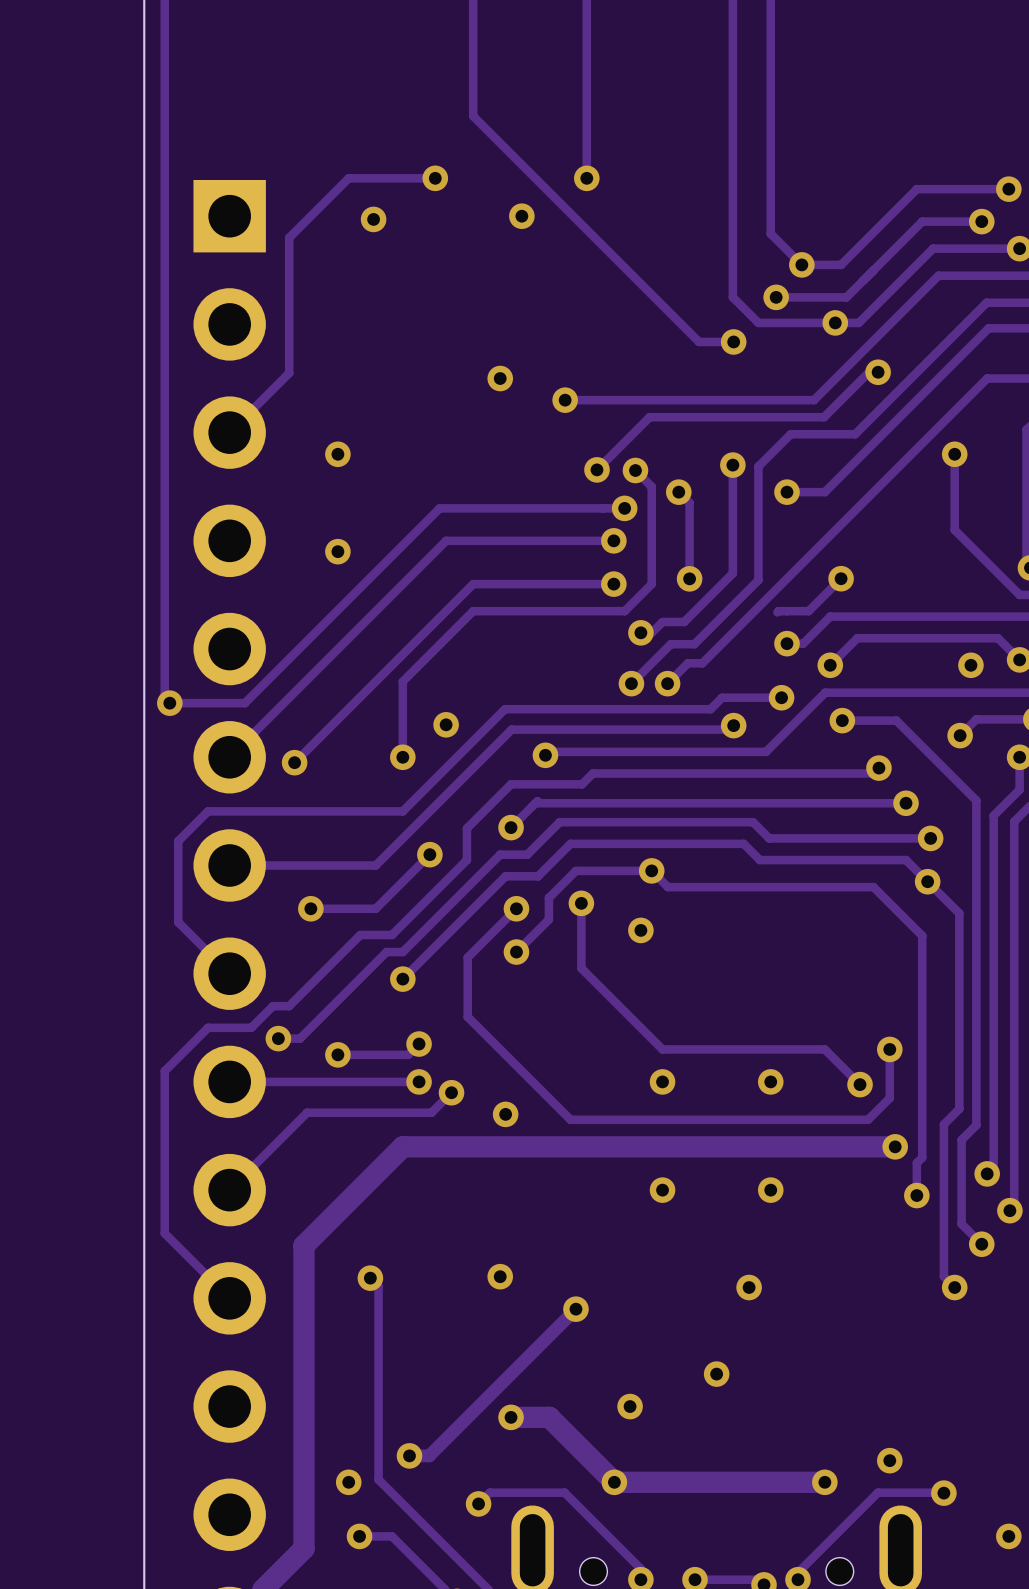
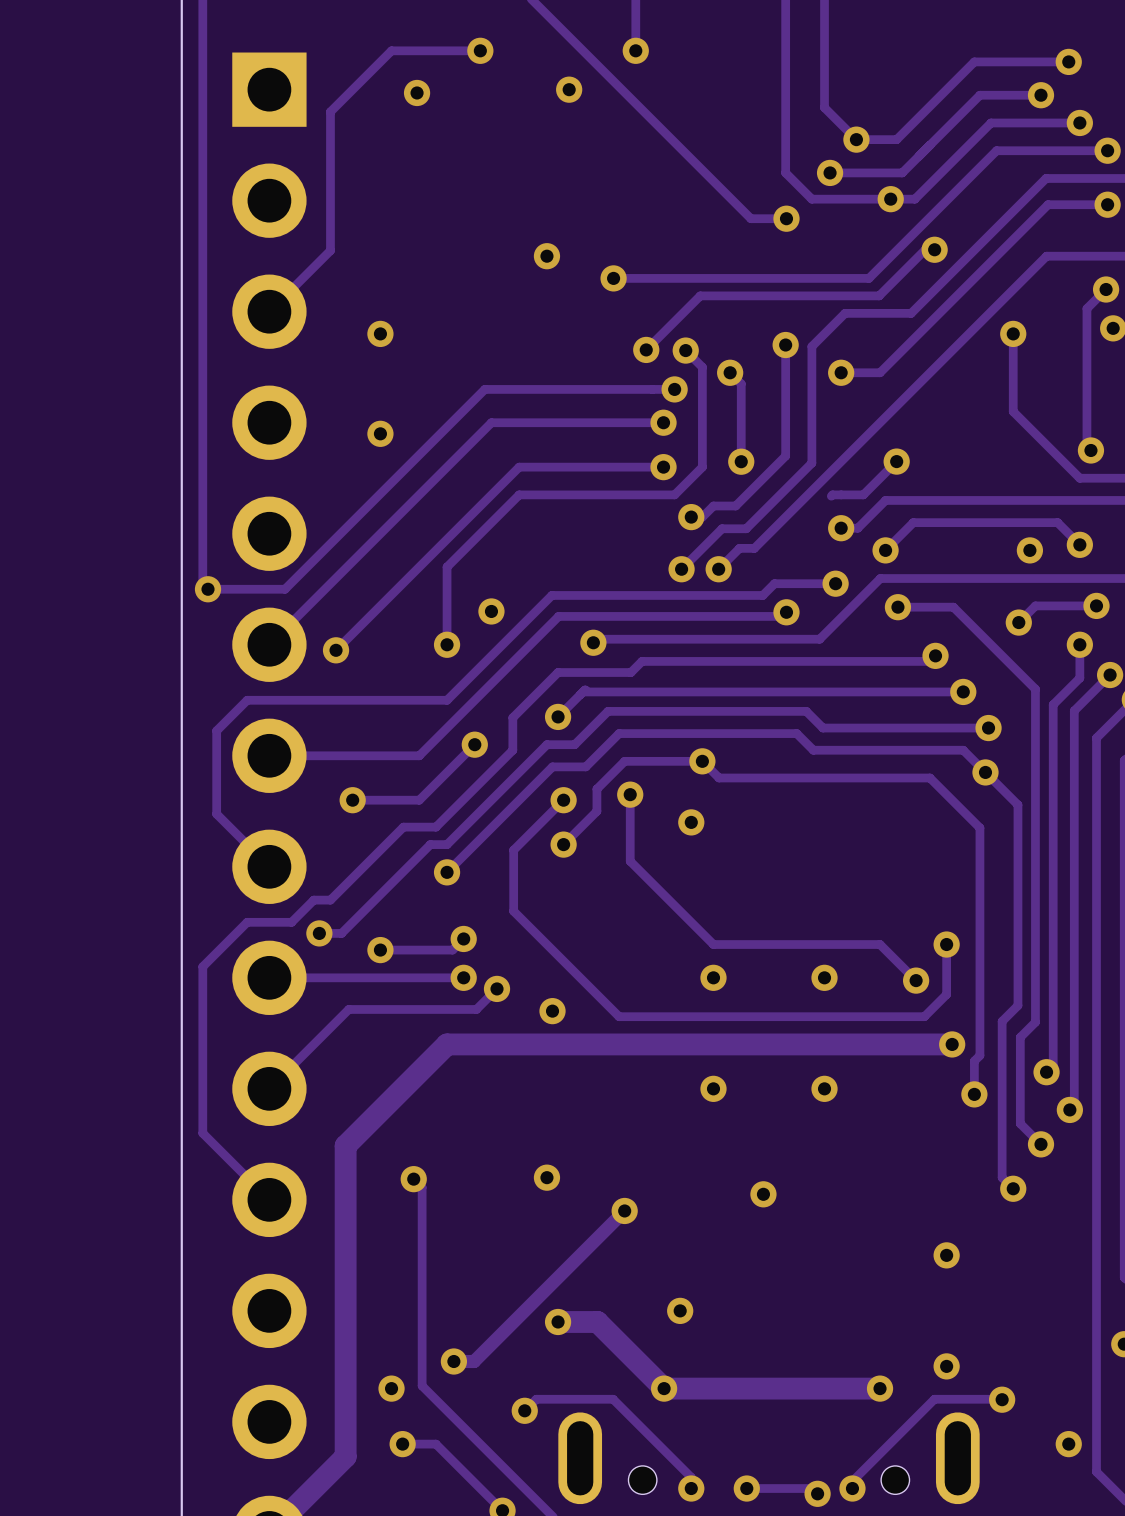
via position: (749, 1287) -> (763, 1194)
via: none -> (946, 1255)
via: (716, 1374) -> none

